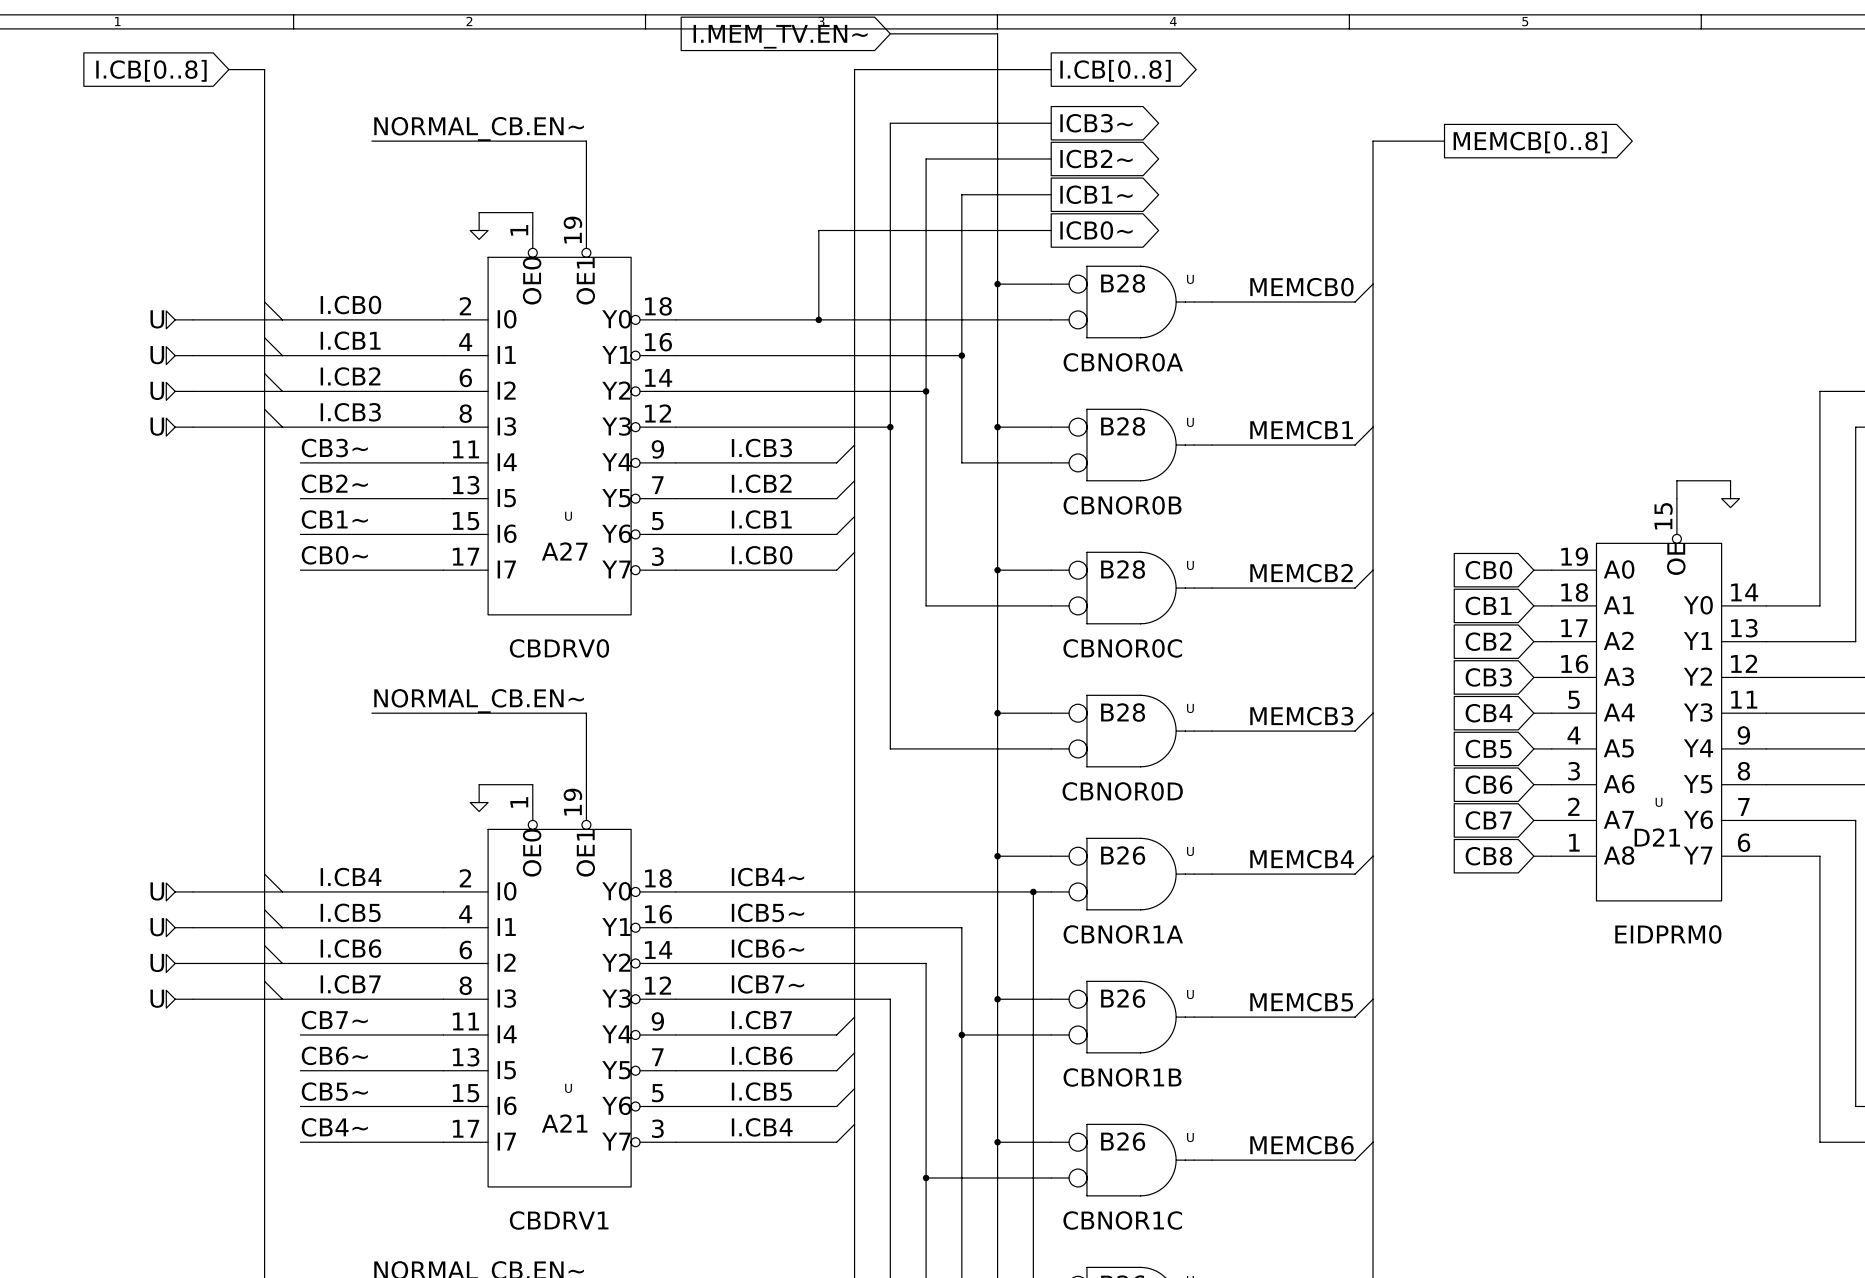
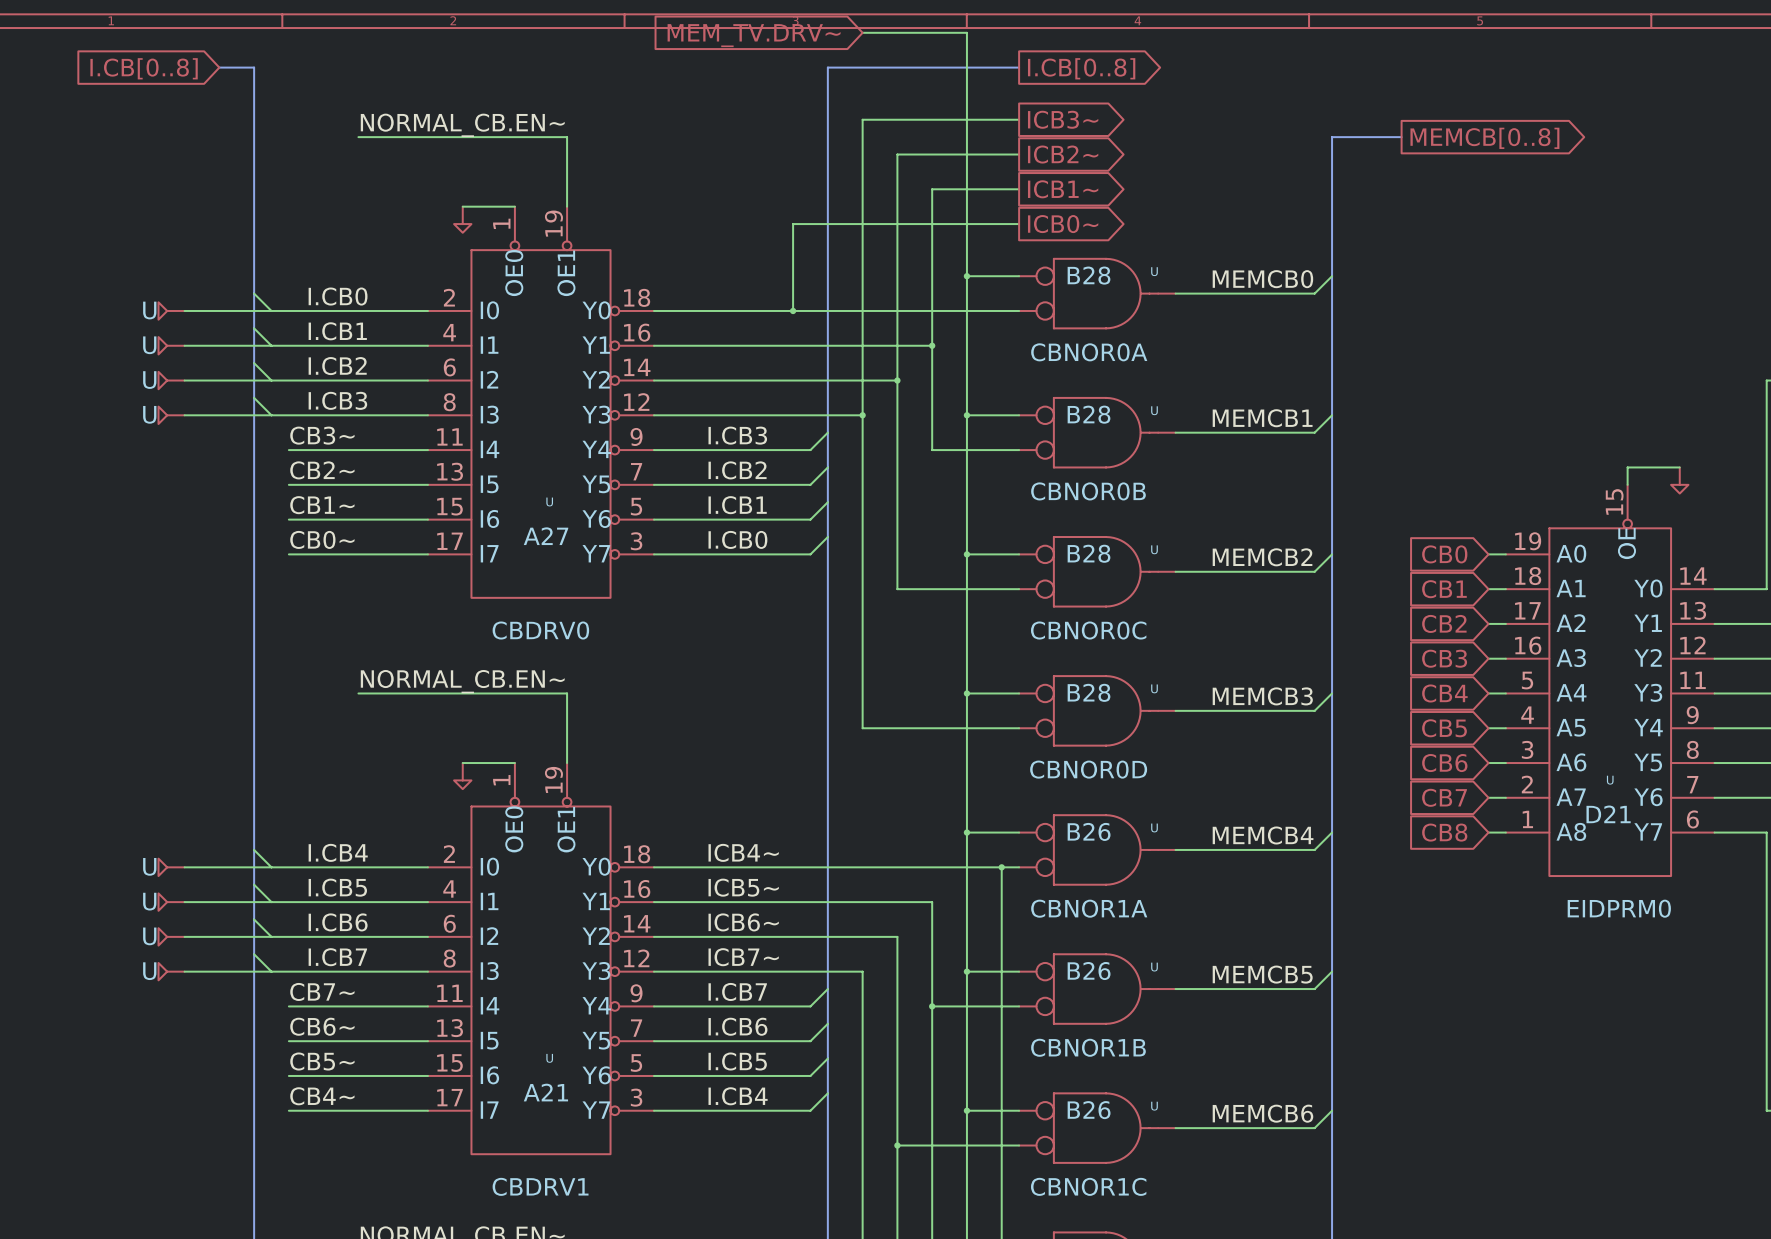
global label: I.MEM_TV.EN~ (780, 36) -> MEM_TV.DRV~ (754, 35)

